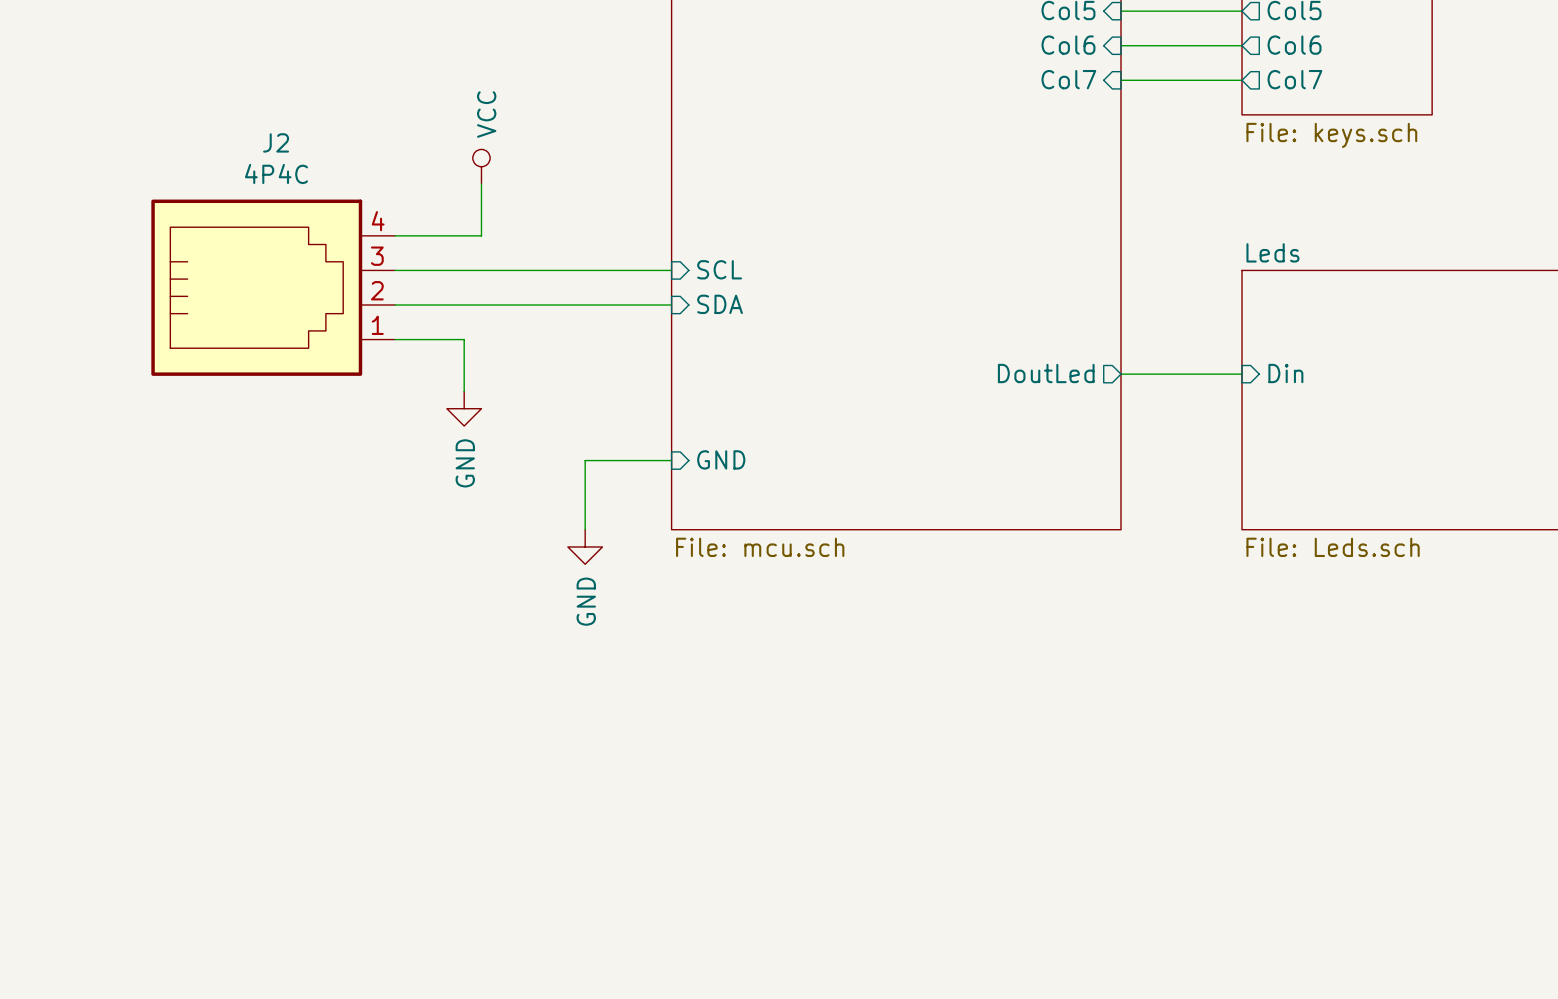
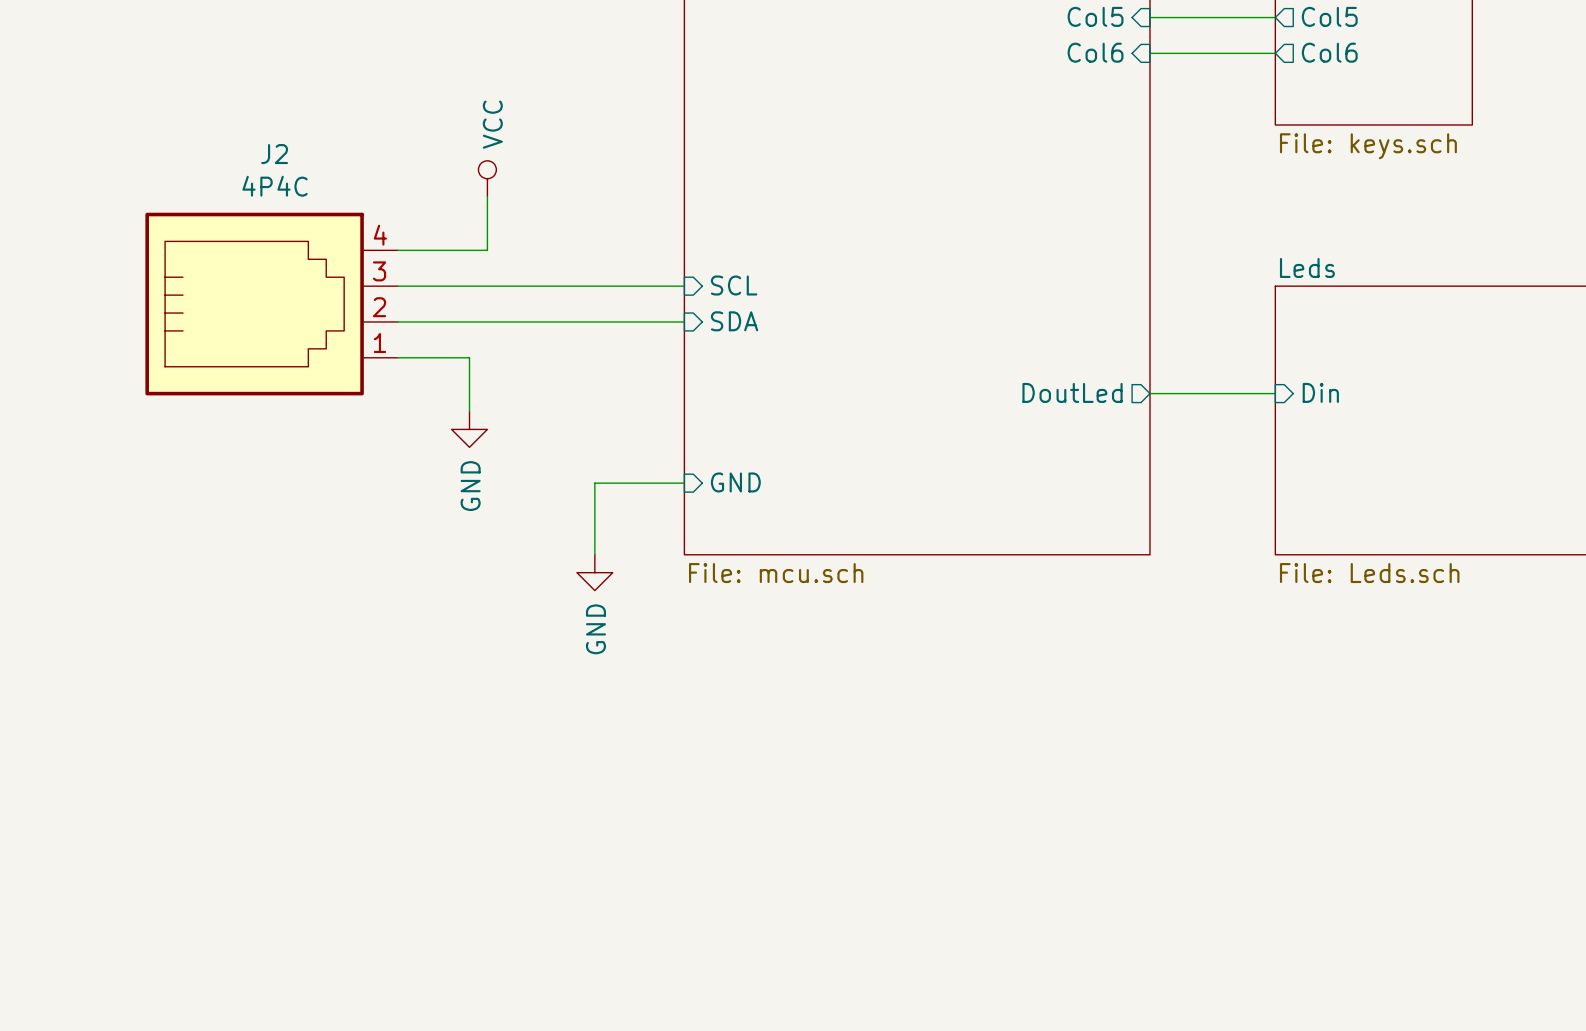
sheet pin: Col7 (1068, 79) -> none
sheet pin: Col7 (1294, 79) -> none
wire: (1121, 80) (1241, 80) -> none

